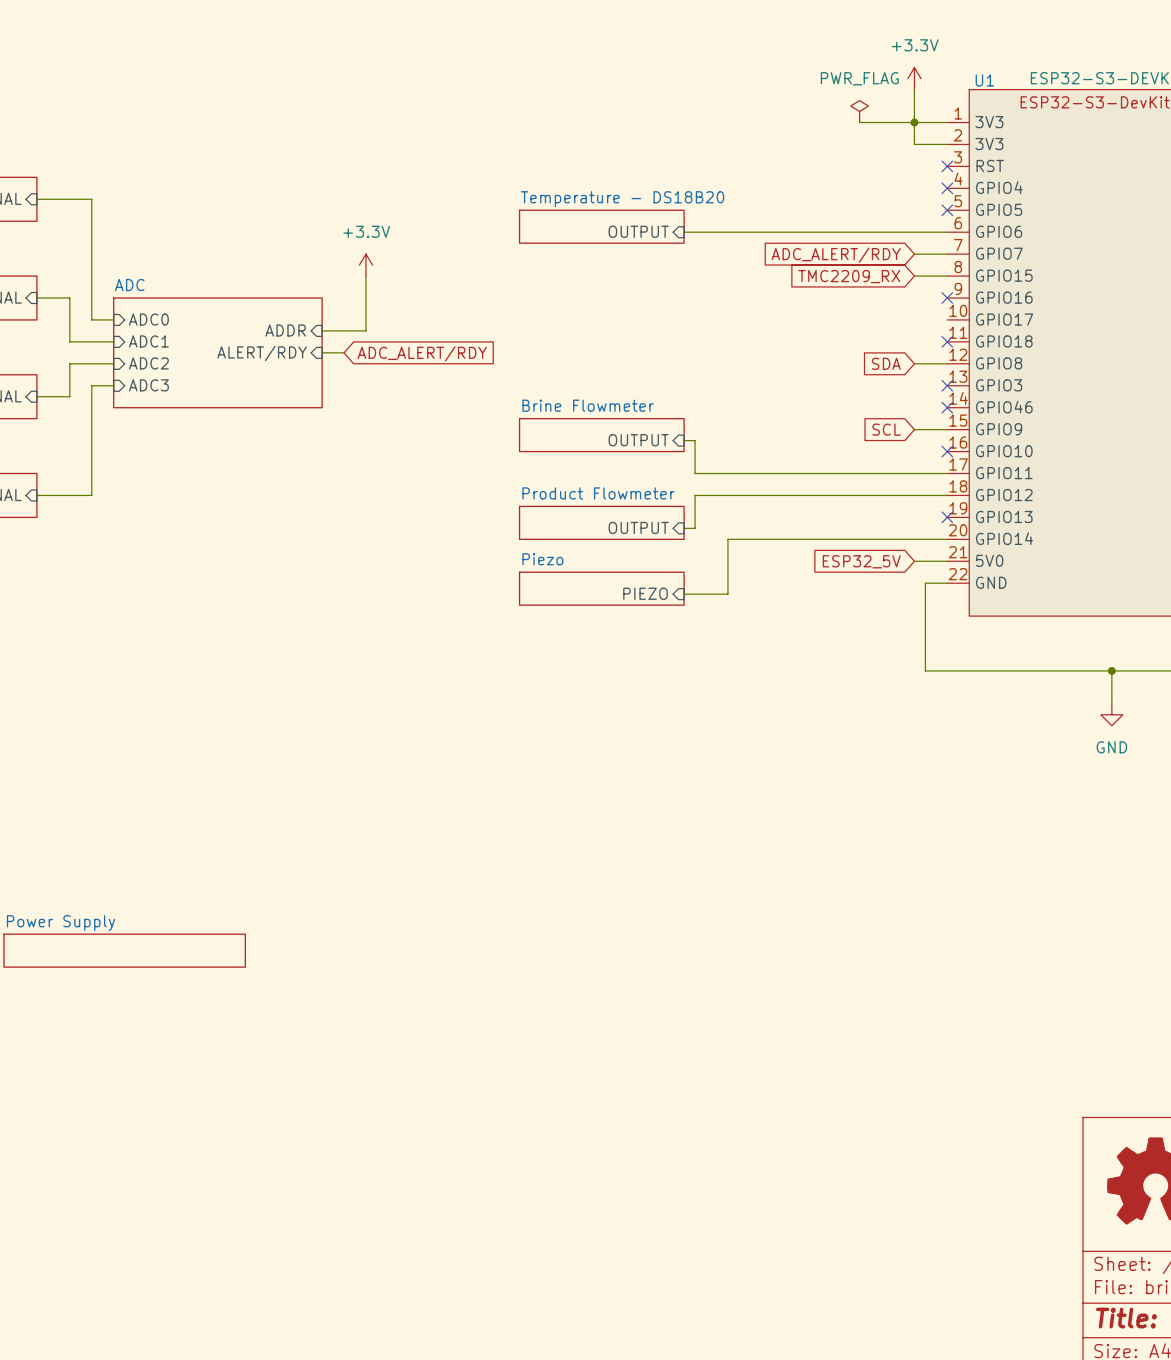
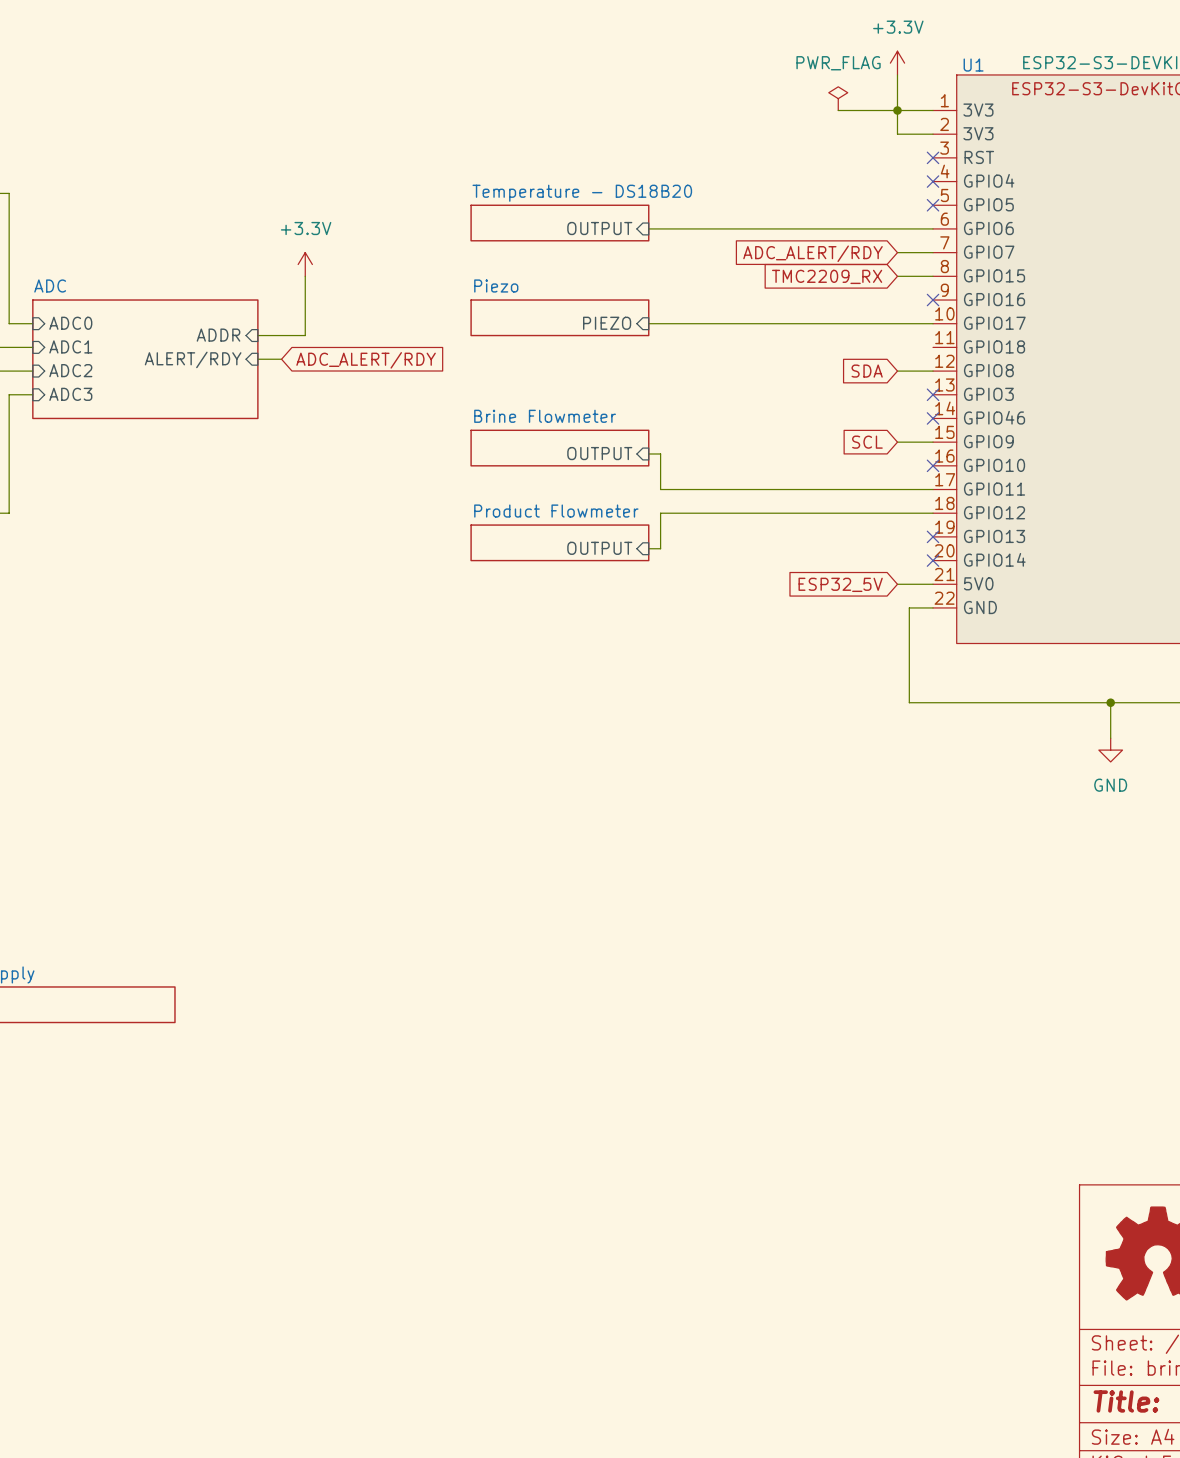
sheet Piezo: none -> (559, 317)
sheet pin: none -> PIEZO (607, 323)
wire: none -> (648, 323) (933, 323)
no-connect mark: (947, 341) -> none
wire: (947, 539) (727, 539) (727, 594) (684, 594) -> none
no-connect mark: none -> (933, 560)
sheet Piezo: (601, 588) -> none
sheet pin: PIEZO (645, 593) -> none

